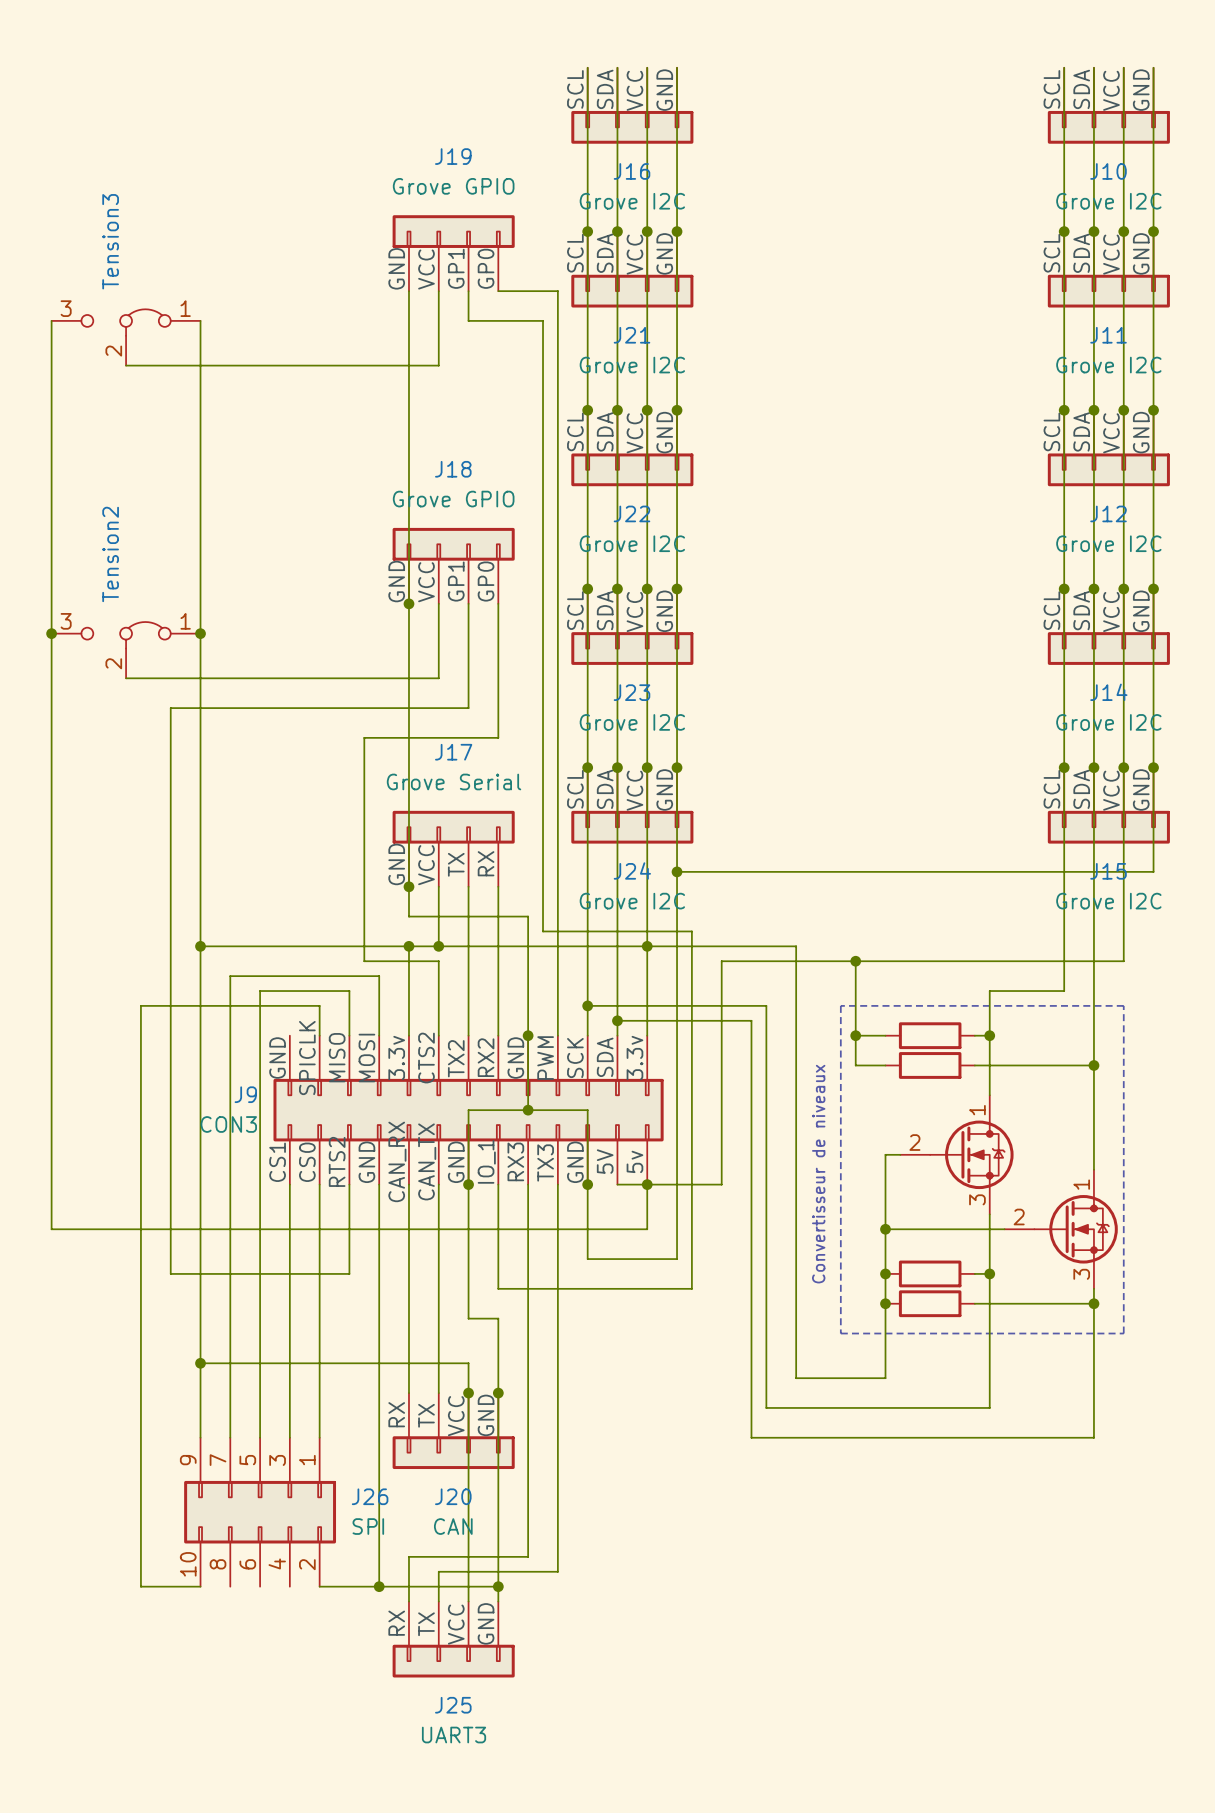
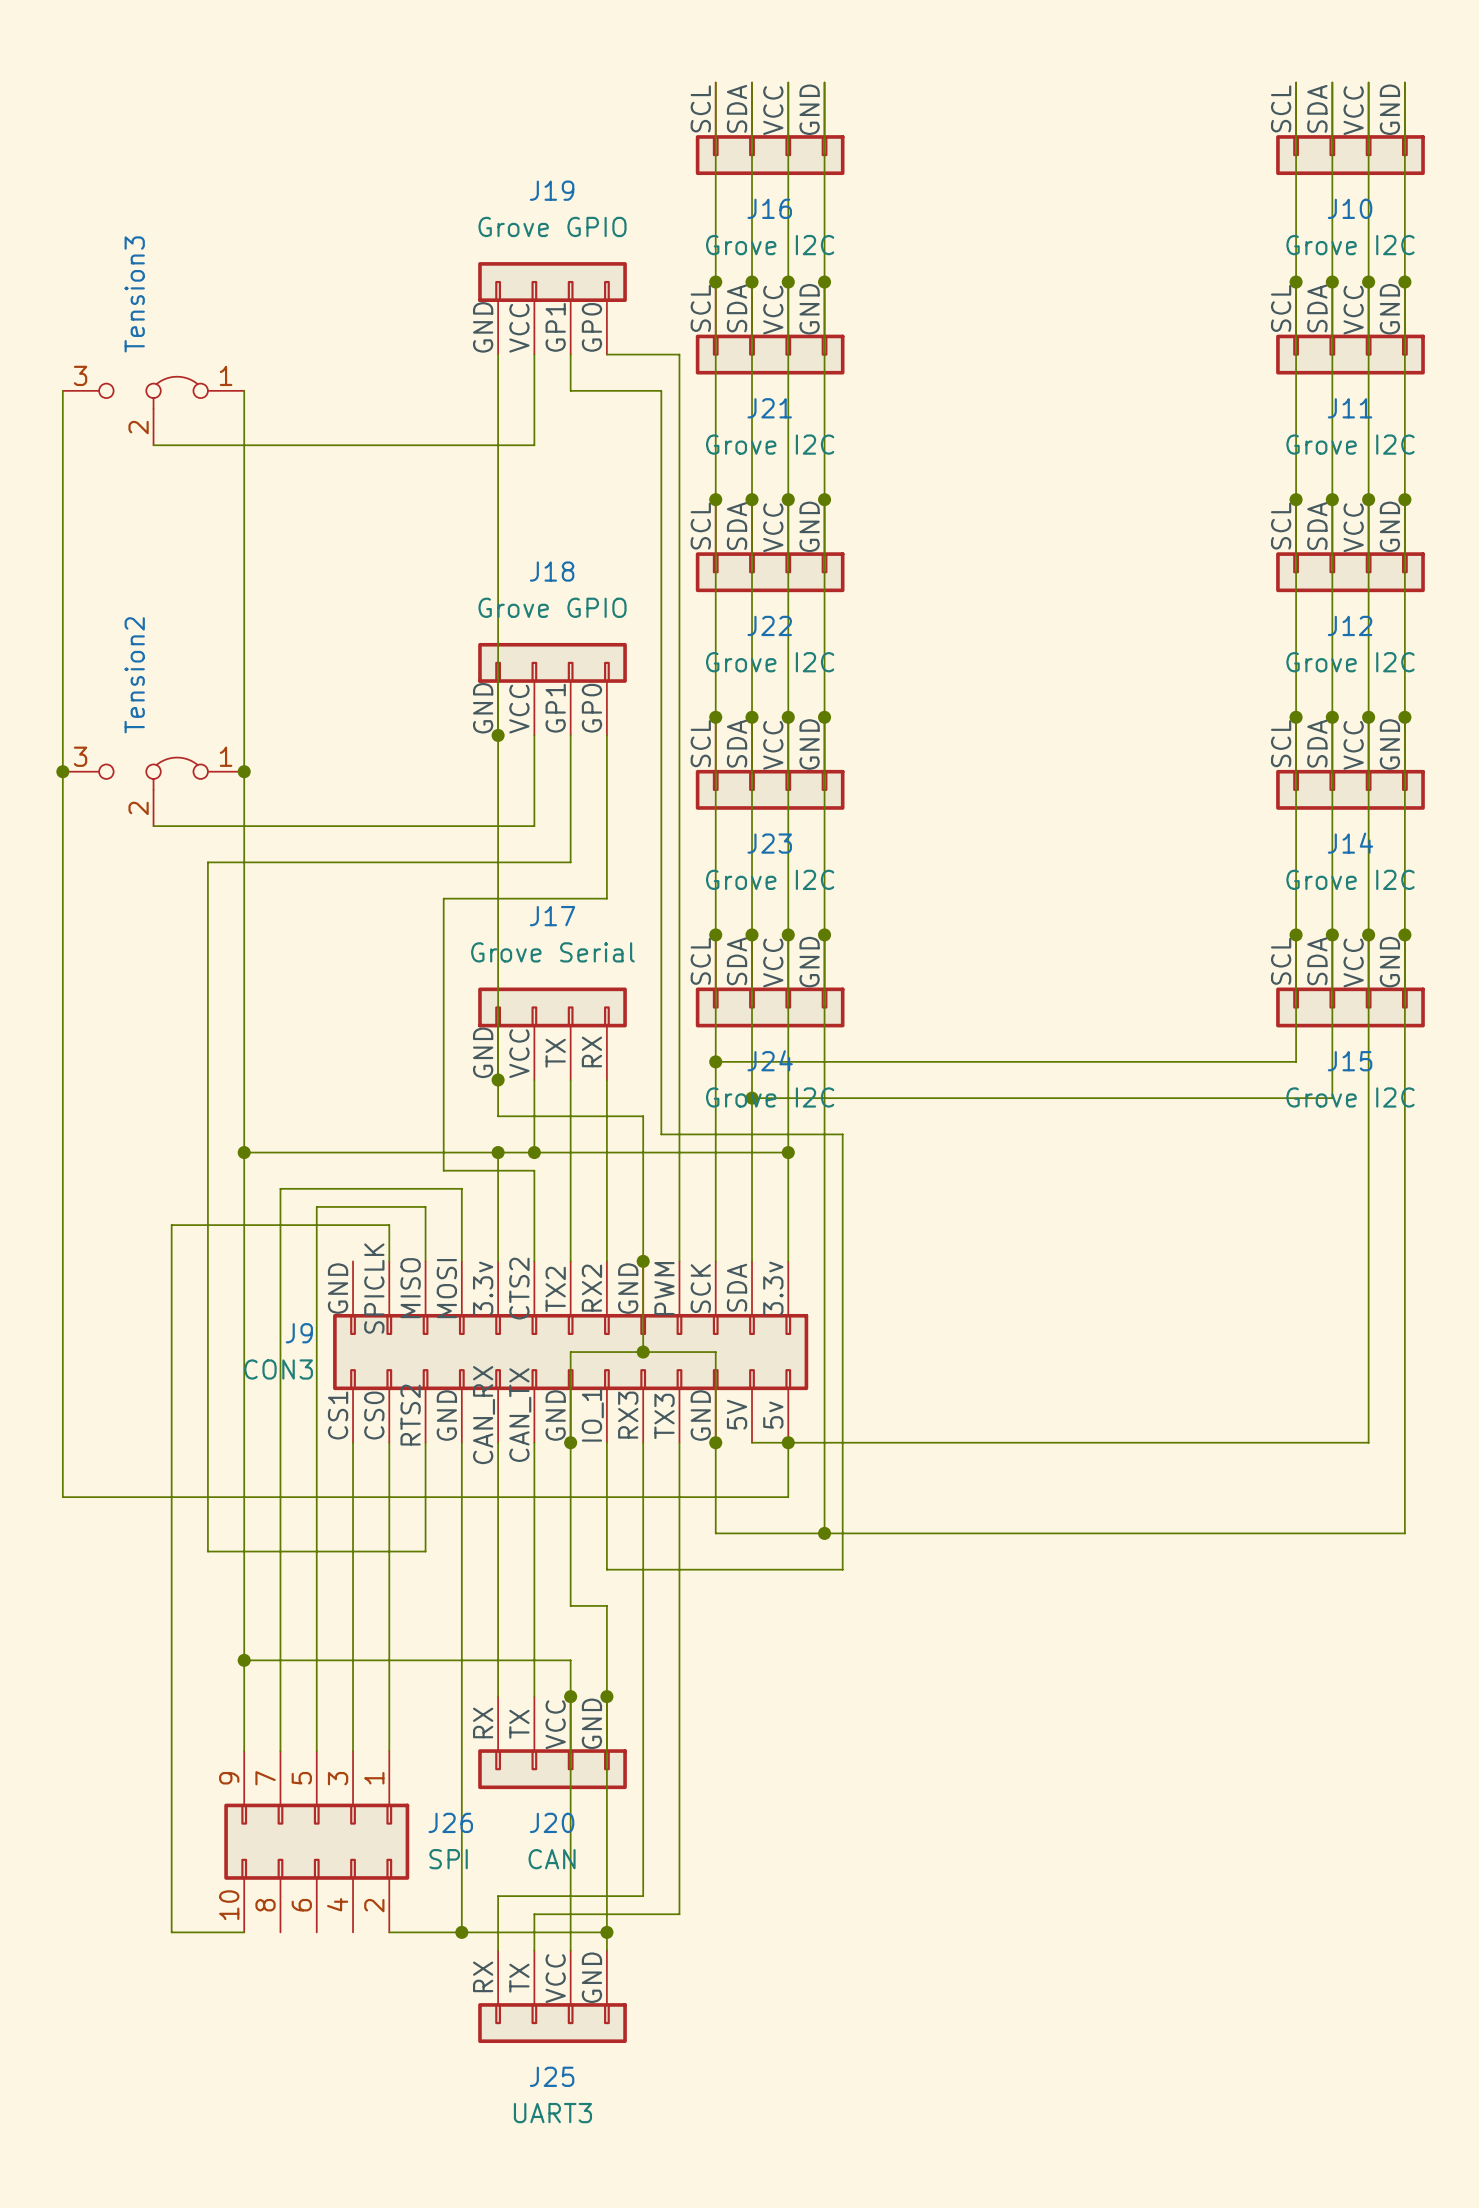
wire: none -> (715, 1061) (824, 1061)
junction: none -> (715, 1061)
junction: (677, 871) -> none
wire: (1153, 871) (1064, 871) (1064, 991) (989, 991) (989, 1095) -> (1404, 1061) (1404, 1533) (824, 1533)
junction: none -> (752, 1098)
wire: (1093, 901) (1093, 1169) -> (1332, 1098) (752, 1098)
wire: (647, 946) (796, 946) (796, 1378) (885, 1378) (885, 1154) (900, 1154) -> none
wire: (855, 961) (855, 1065) (885, 1065) -> none
junction: (855, 961) -> none
wire: (1123, 961) (721, 961) (721, 1184) -> (1368, 1170) (1368, 1442) (878, 1442)
wire: (587, 1005) (766, 1005) (766, 1407) (989, 1407) (989, 1214) -> none
junction: (587, 1005) -> none
line: (840, 1005) (1123, 1005) (1123, 1333) (840, 1333) (840, 1005) -> none
wire: (617, 1020) (751, 1020) (751, 1437) (1093, 1437) (1093, 1288) -> none
junction: (617, 1020) -> none
wire: (855, 1035) (885, 1035) -> none
junction: (855, 1035) -> none
part: (930, 1035) -> none
wire: (974, 1035) (989, 1035) -> none
junction: (989, 1035) -> none
part: (930, 1065) -> none
wire: (974, 1065) (1093, 1065) -> none
junction: (1093, 1065) -> none
part: (956, 1154) -> none
text: Convertisseur de niveaux (818, 1174) -> none
wire: (885, 1229) (1004, 1229) -> none
junction: (885, 1229) -> none
part: (1061, 1229) -> none
junction: none -> (824, 1533)
junction: (885, 1273) -> none
part: (930, 1273) -> none
wire: (974, 1273) (989, 1273) -> none
junction: (989, 1273) -> none
junction: (885, 1303) -> none
part: (930, 1303) -> none
wire: (974, 1303) (1093, 1303) -> none
junction: (1093, 1303) -> none

